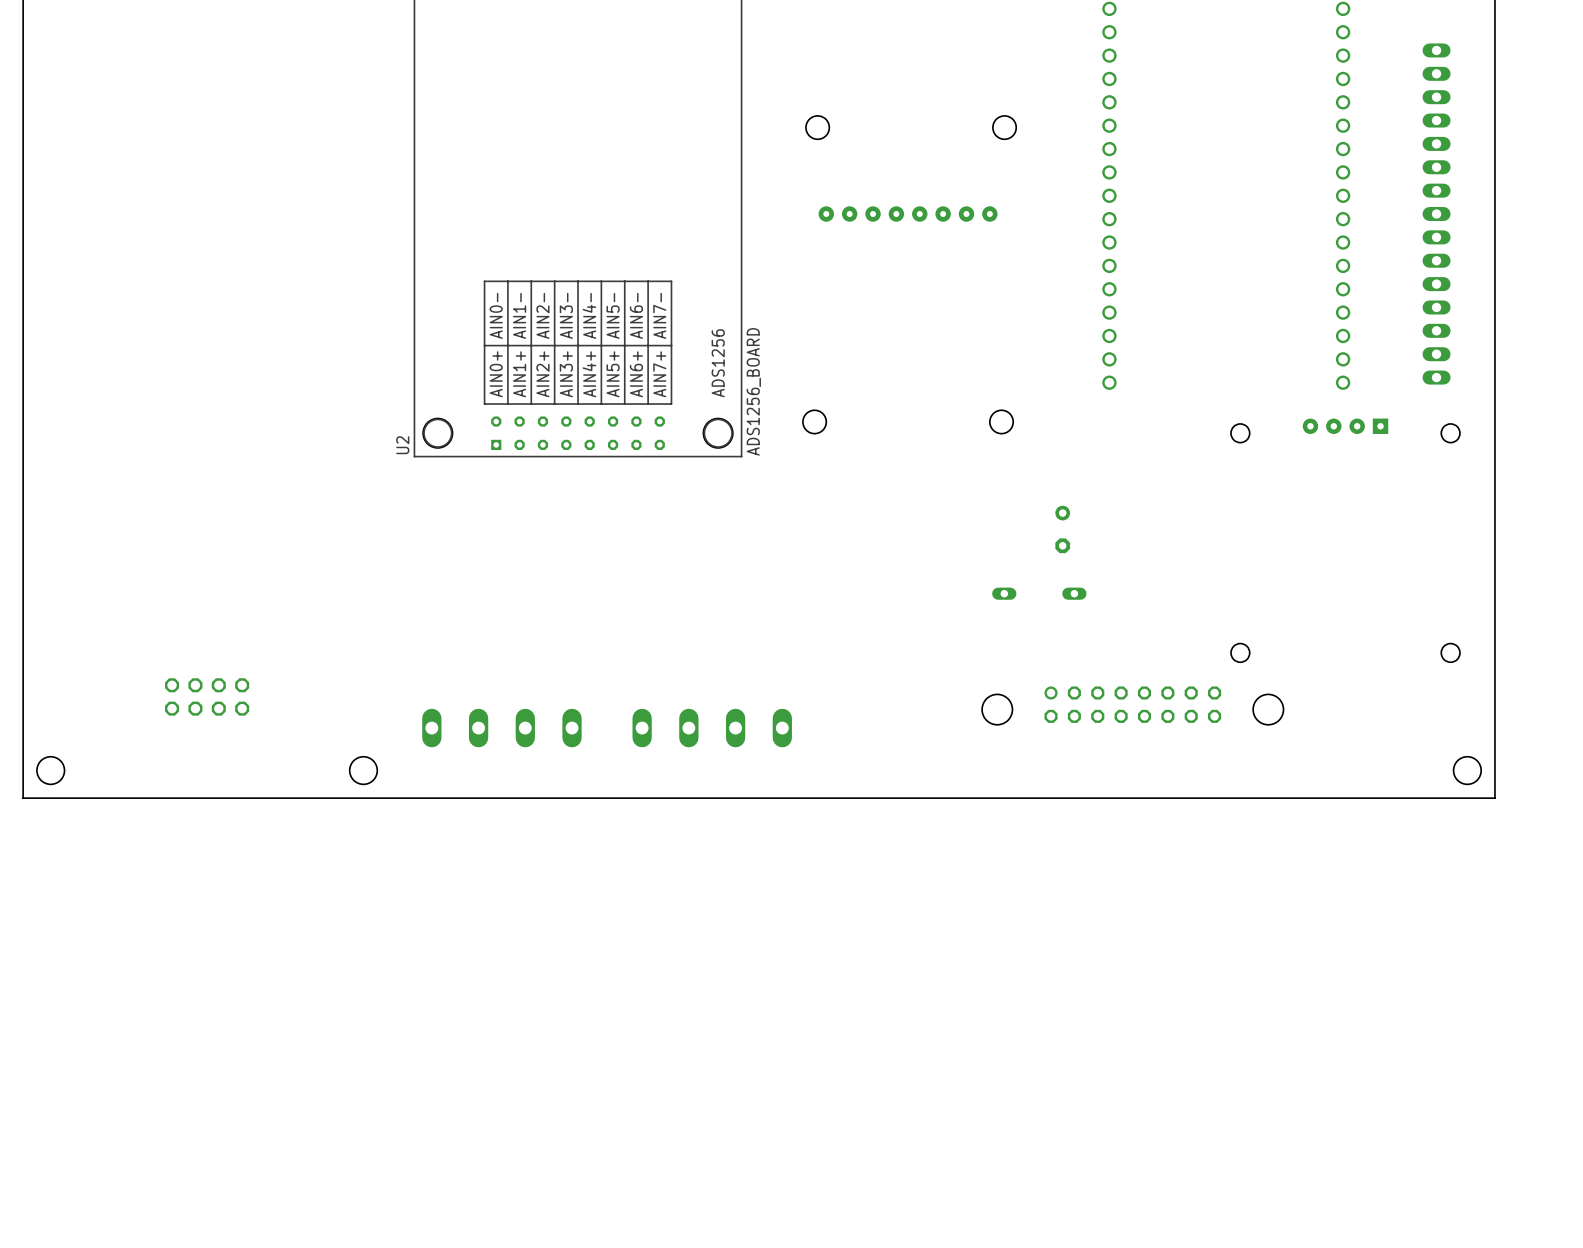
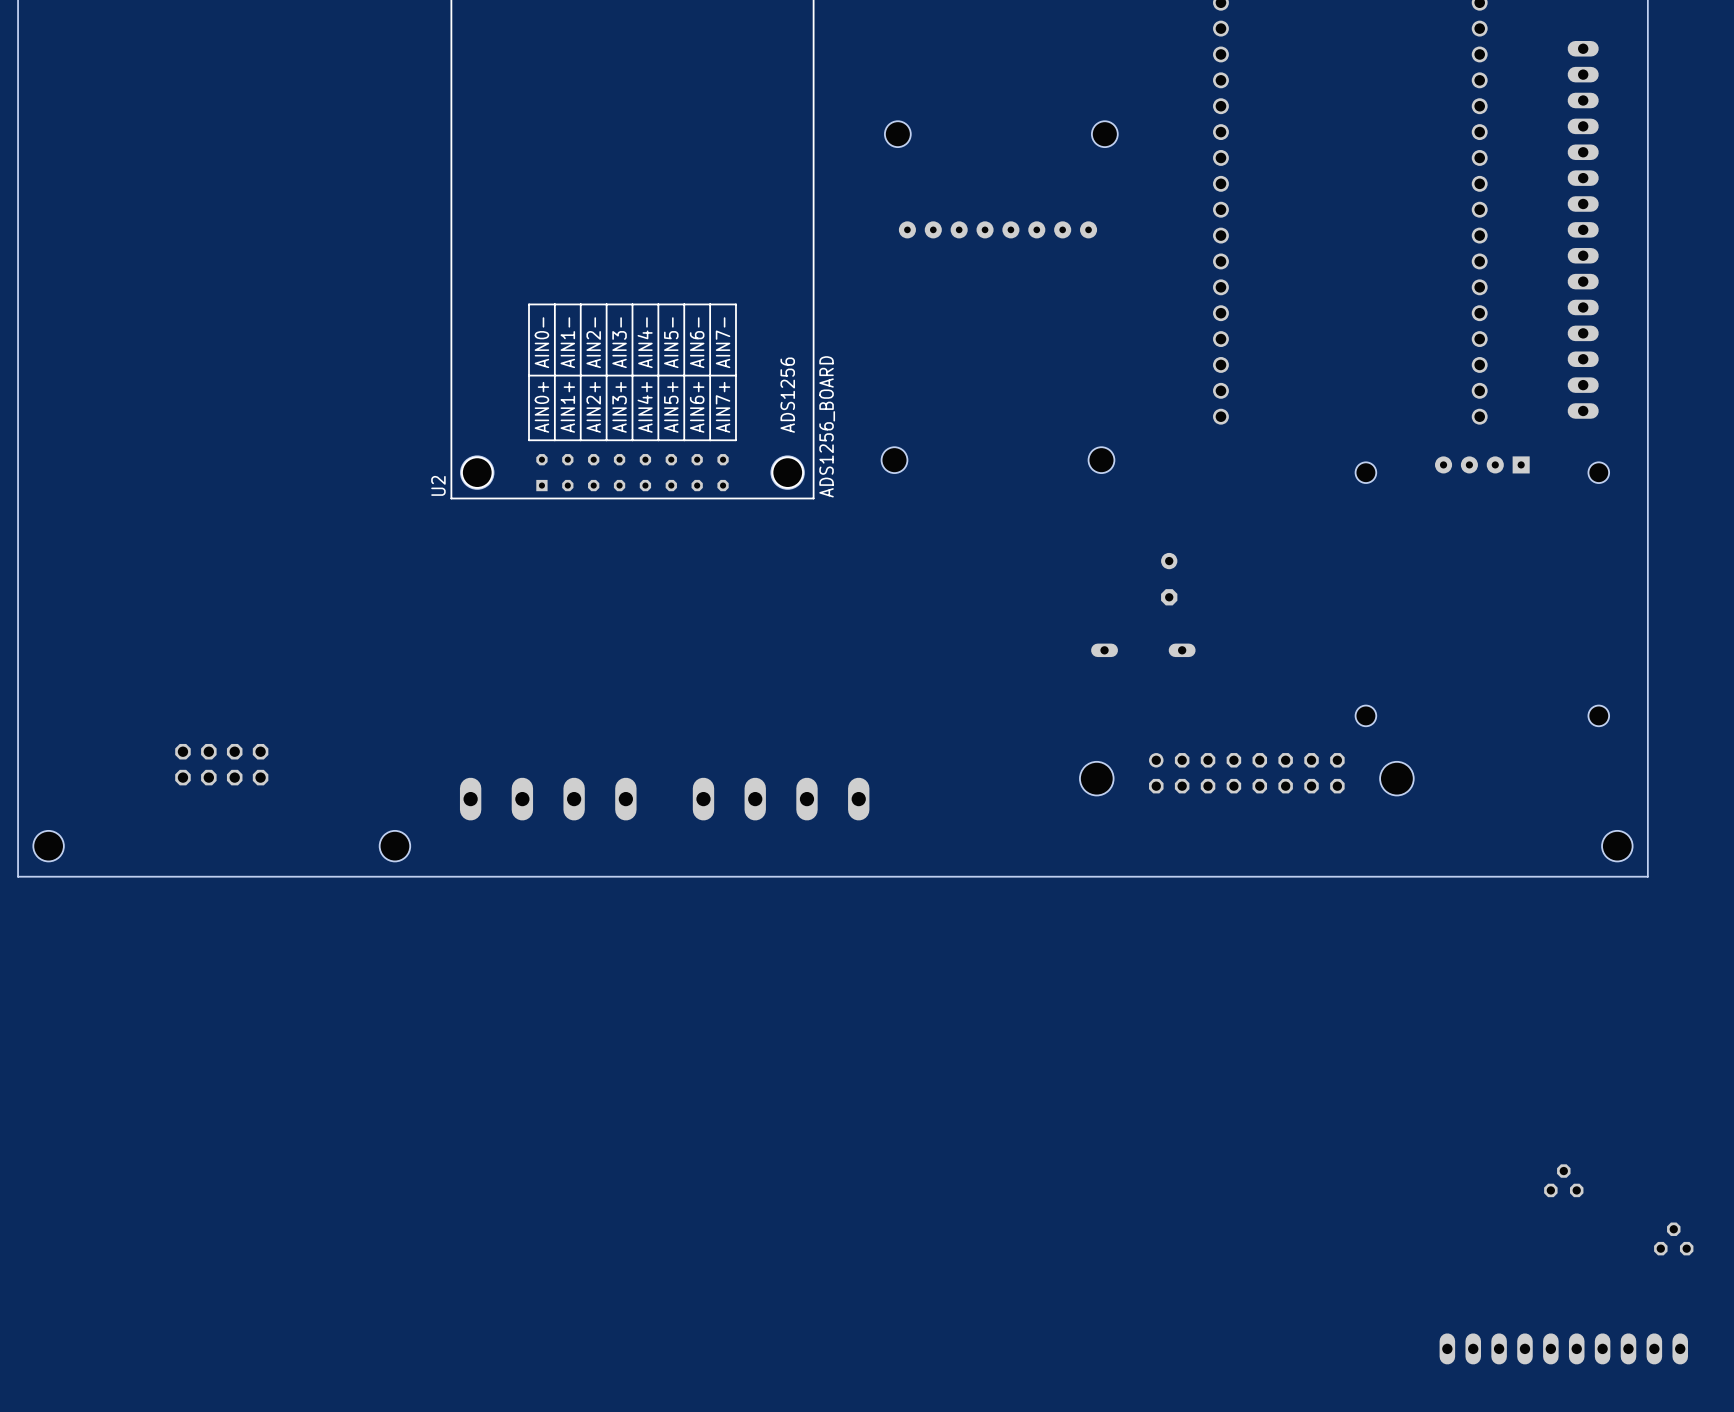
part: none -> (1563, 1180)
part: none -> (1673, 1238)
part: none -> (1563, 1348)

